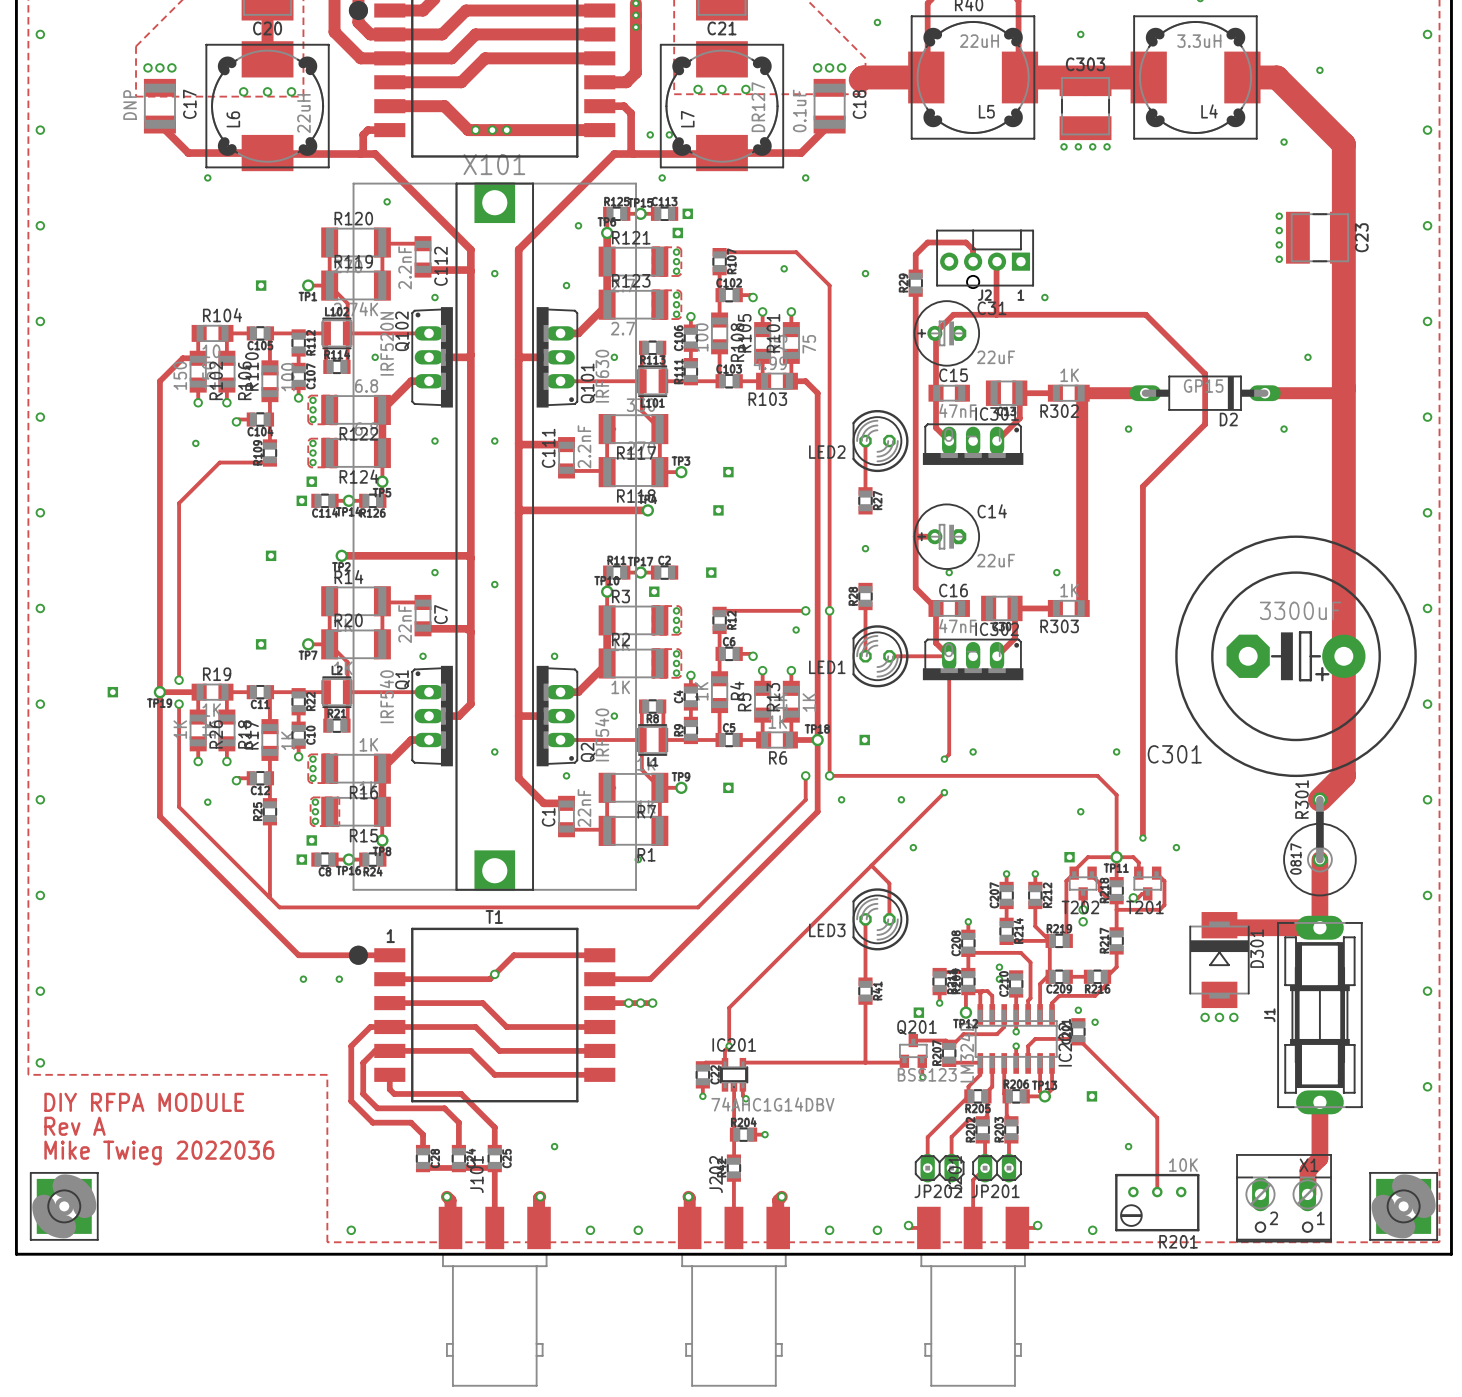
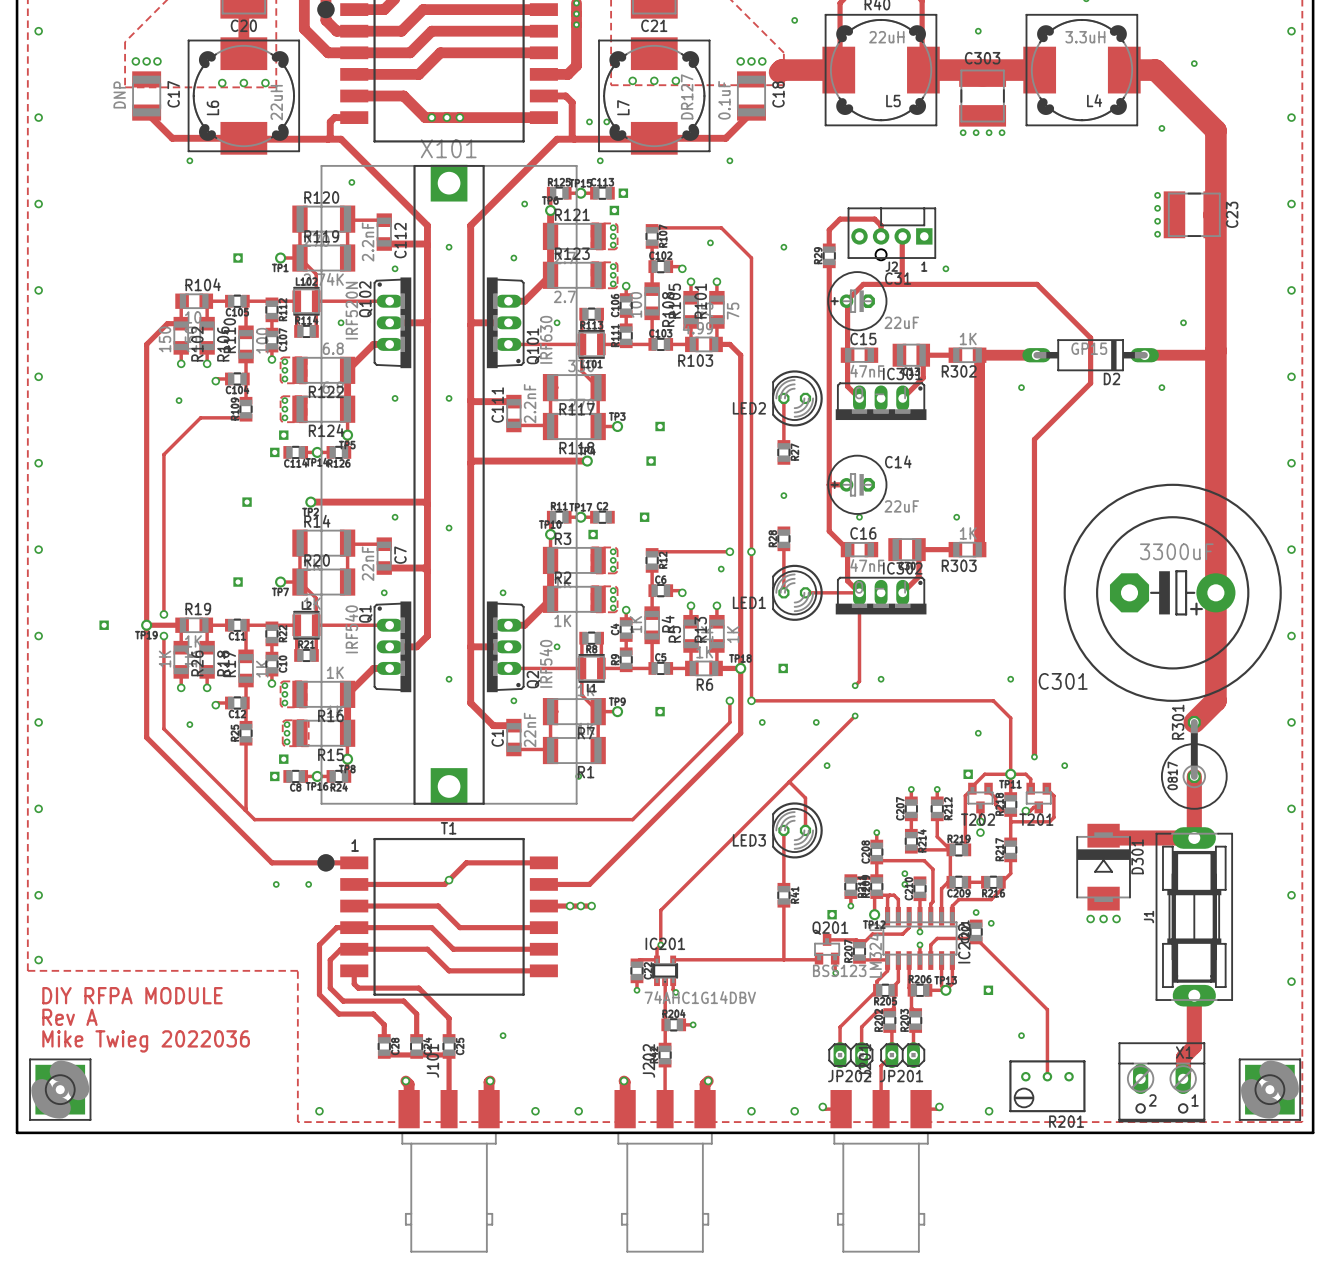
R201 value: 10K (1183, 1165) -> none

